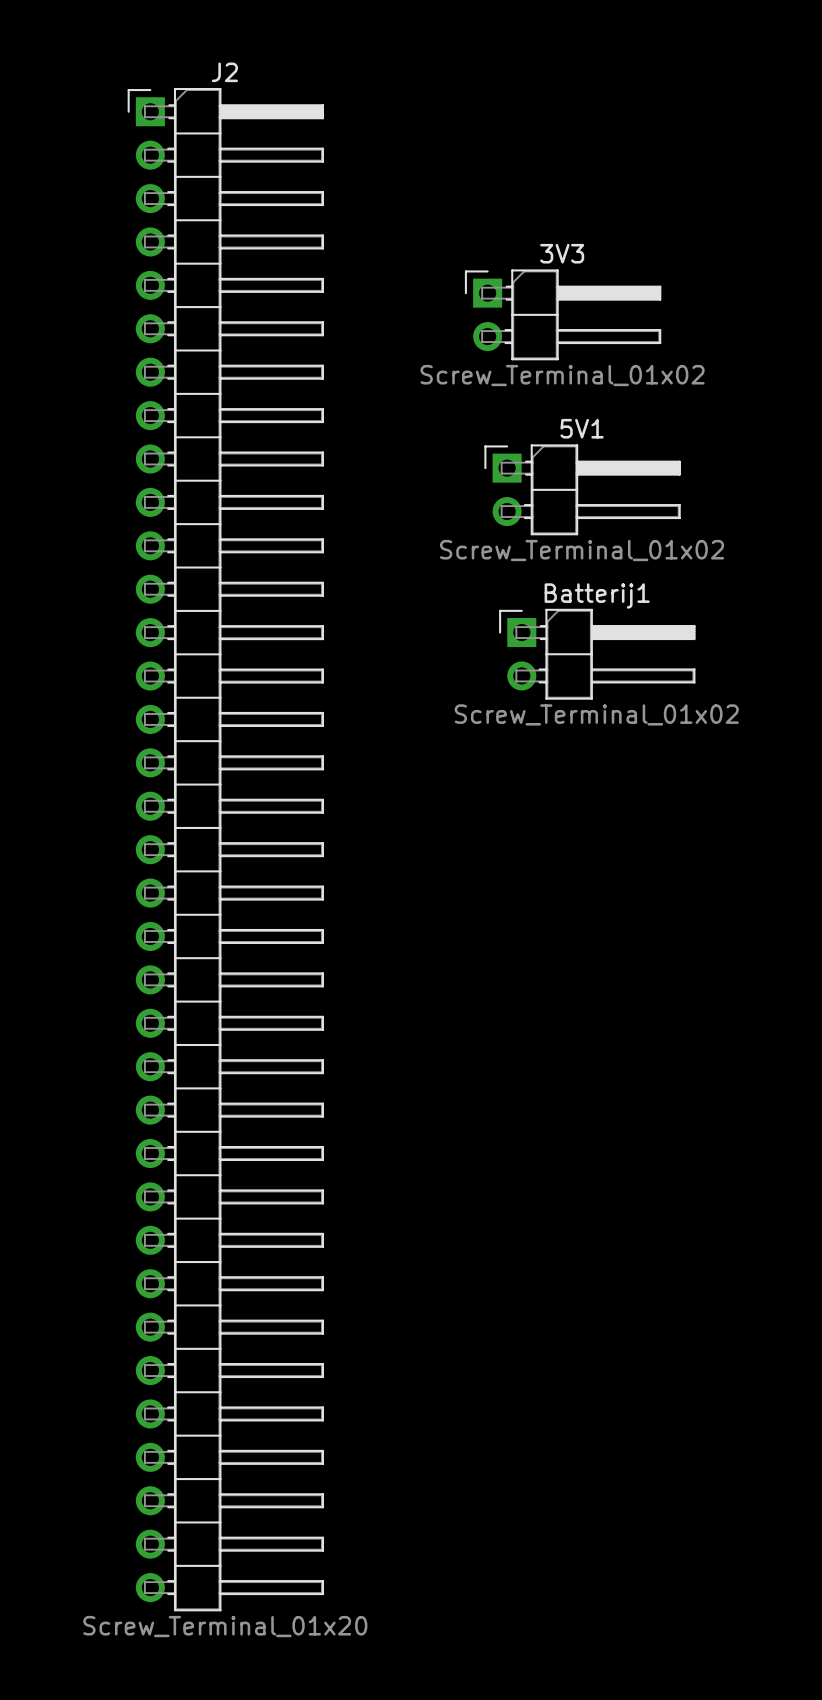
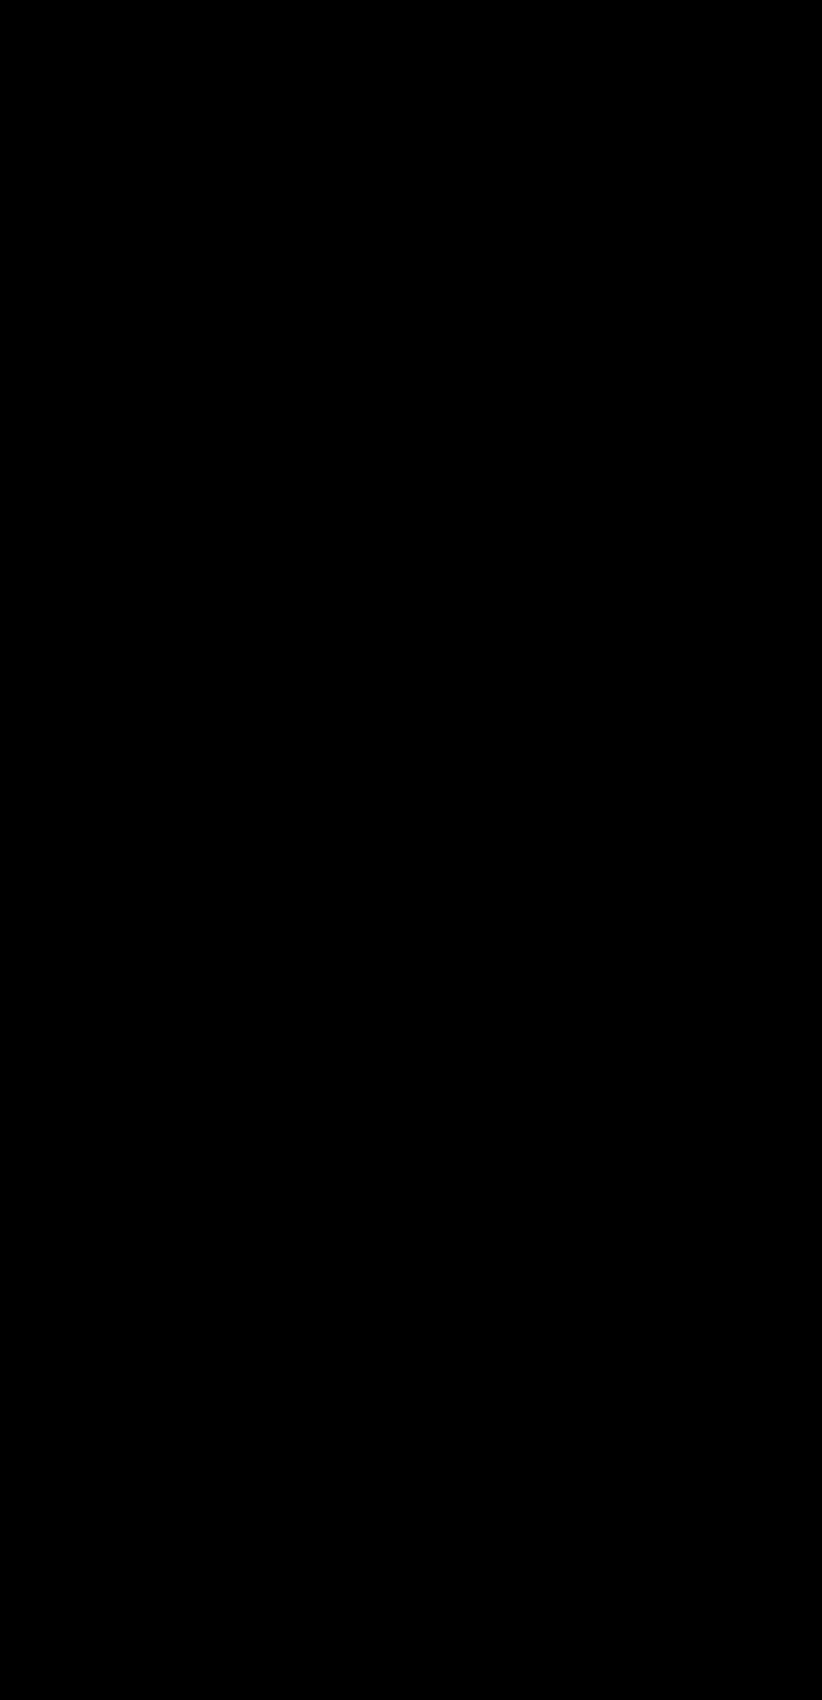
3V3: Screw_Terminal_01x02 (563, 314) -> none
5V1: Screw_Terminal_01x02 (582, 489) -> none
Batterij1: Screw_Terminal_01x02 (597, 654) -> none
J2: Screw_Terminal_01x20 (225, 849) -> none

